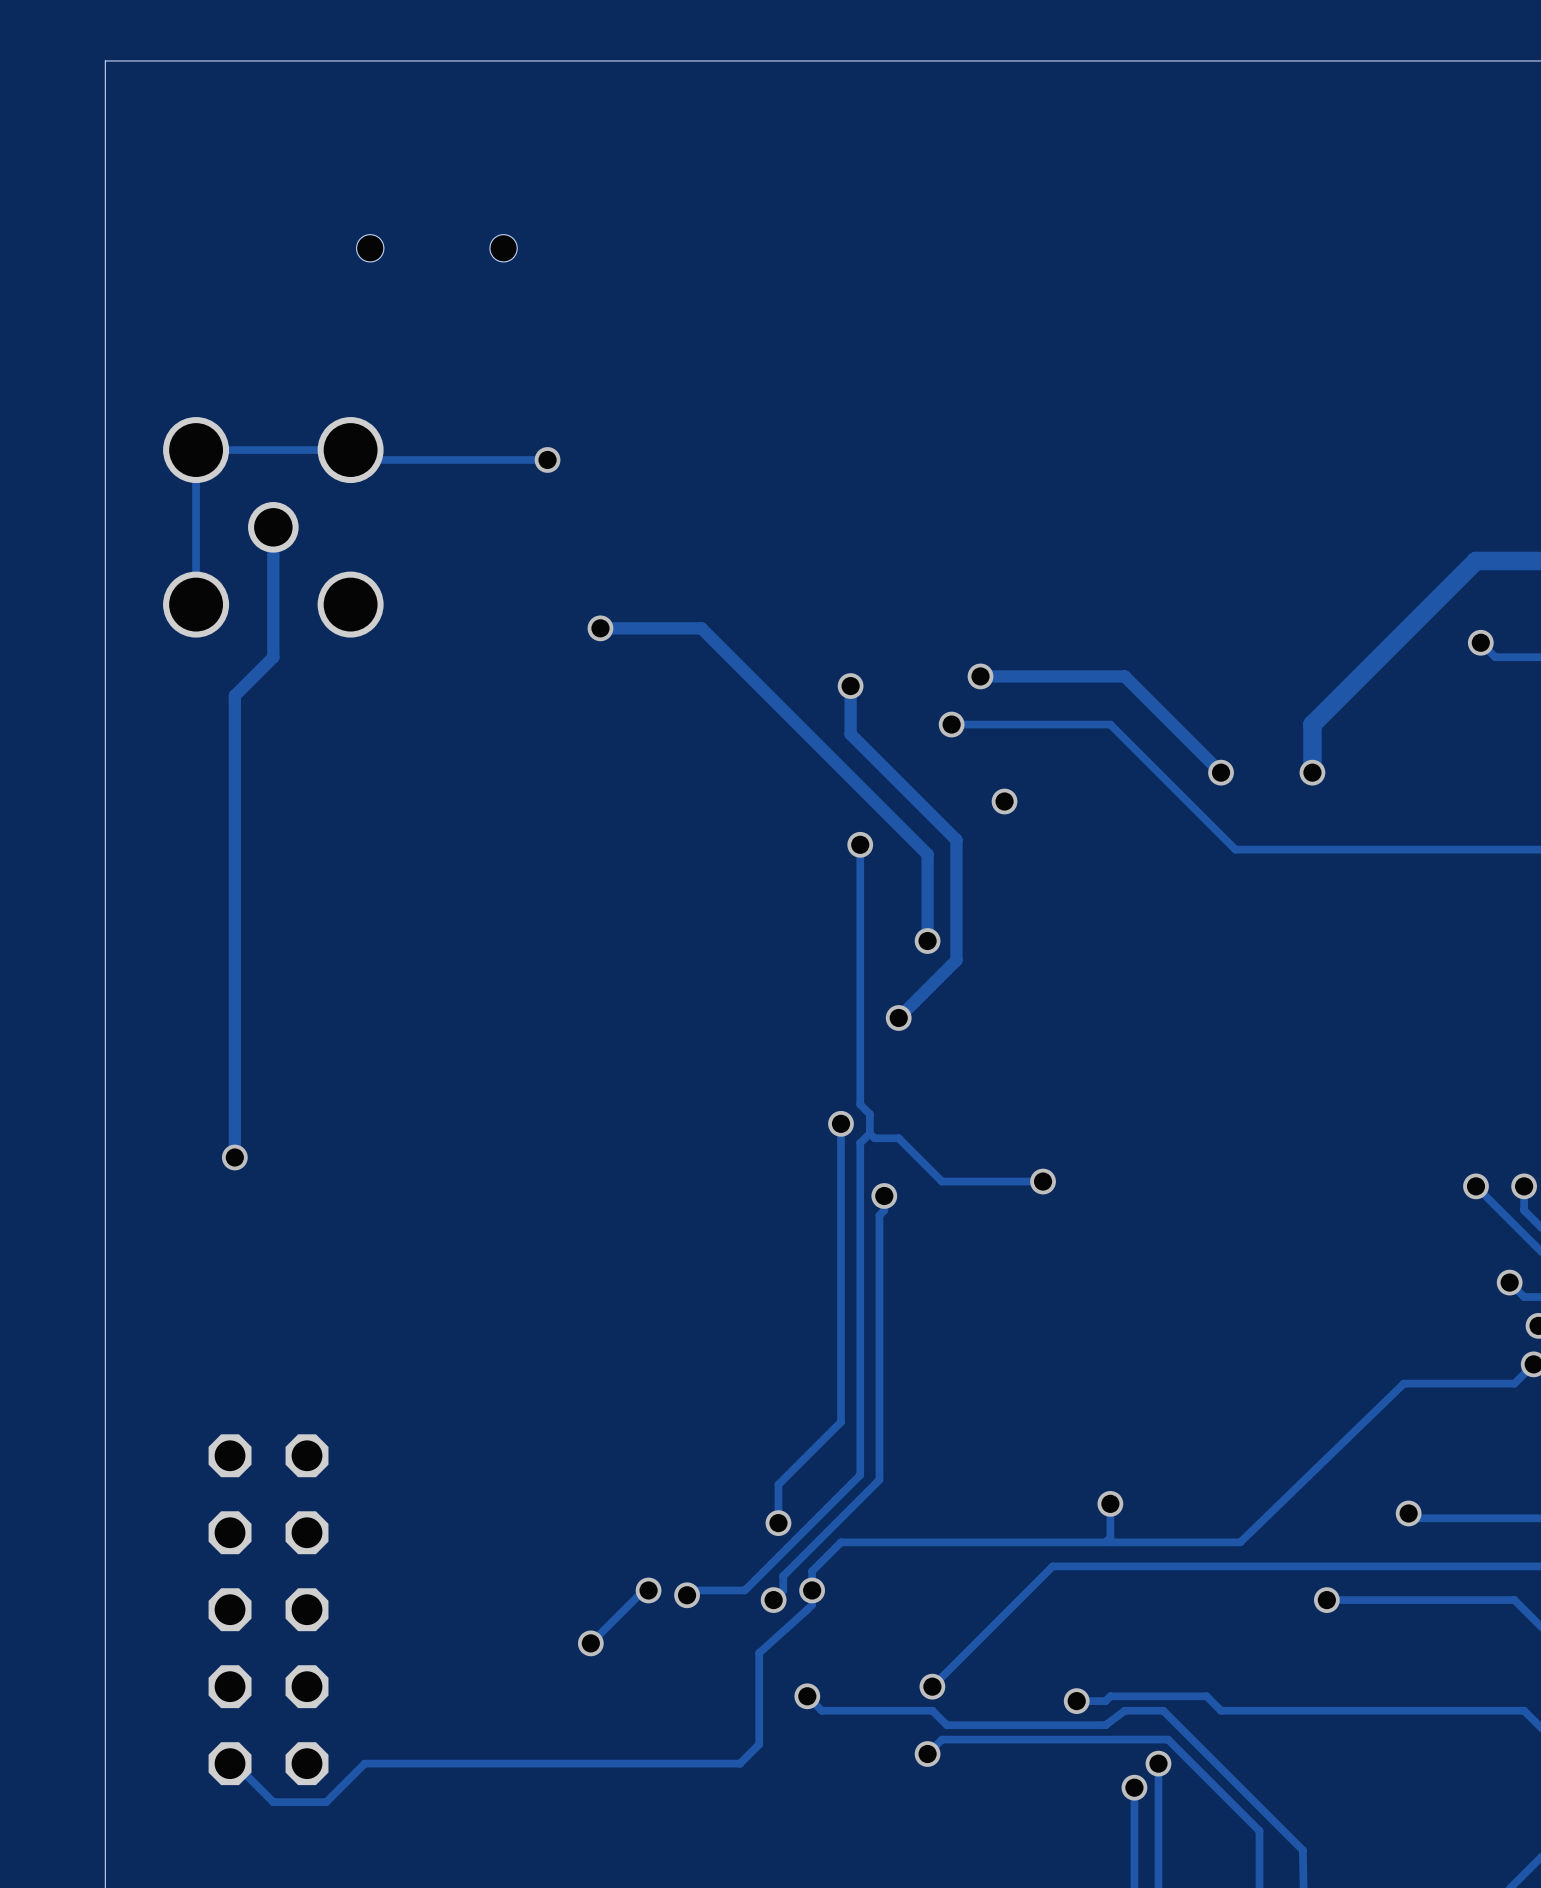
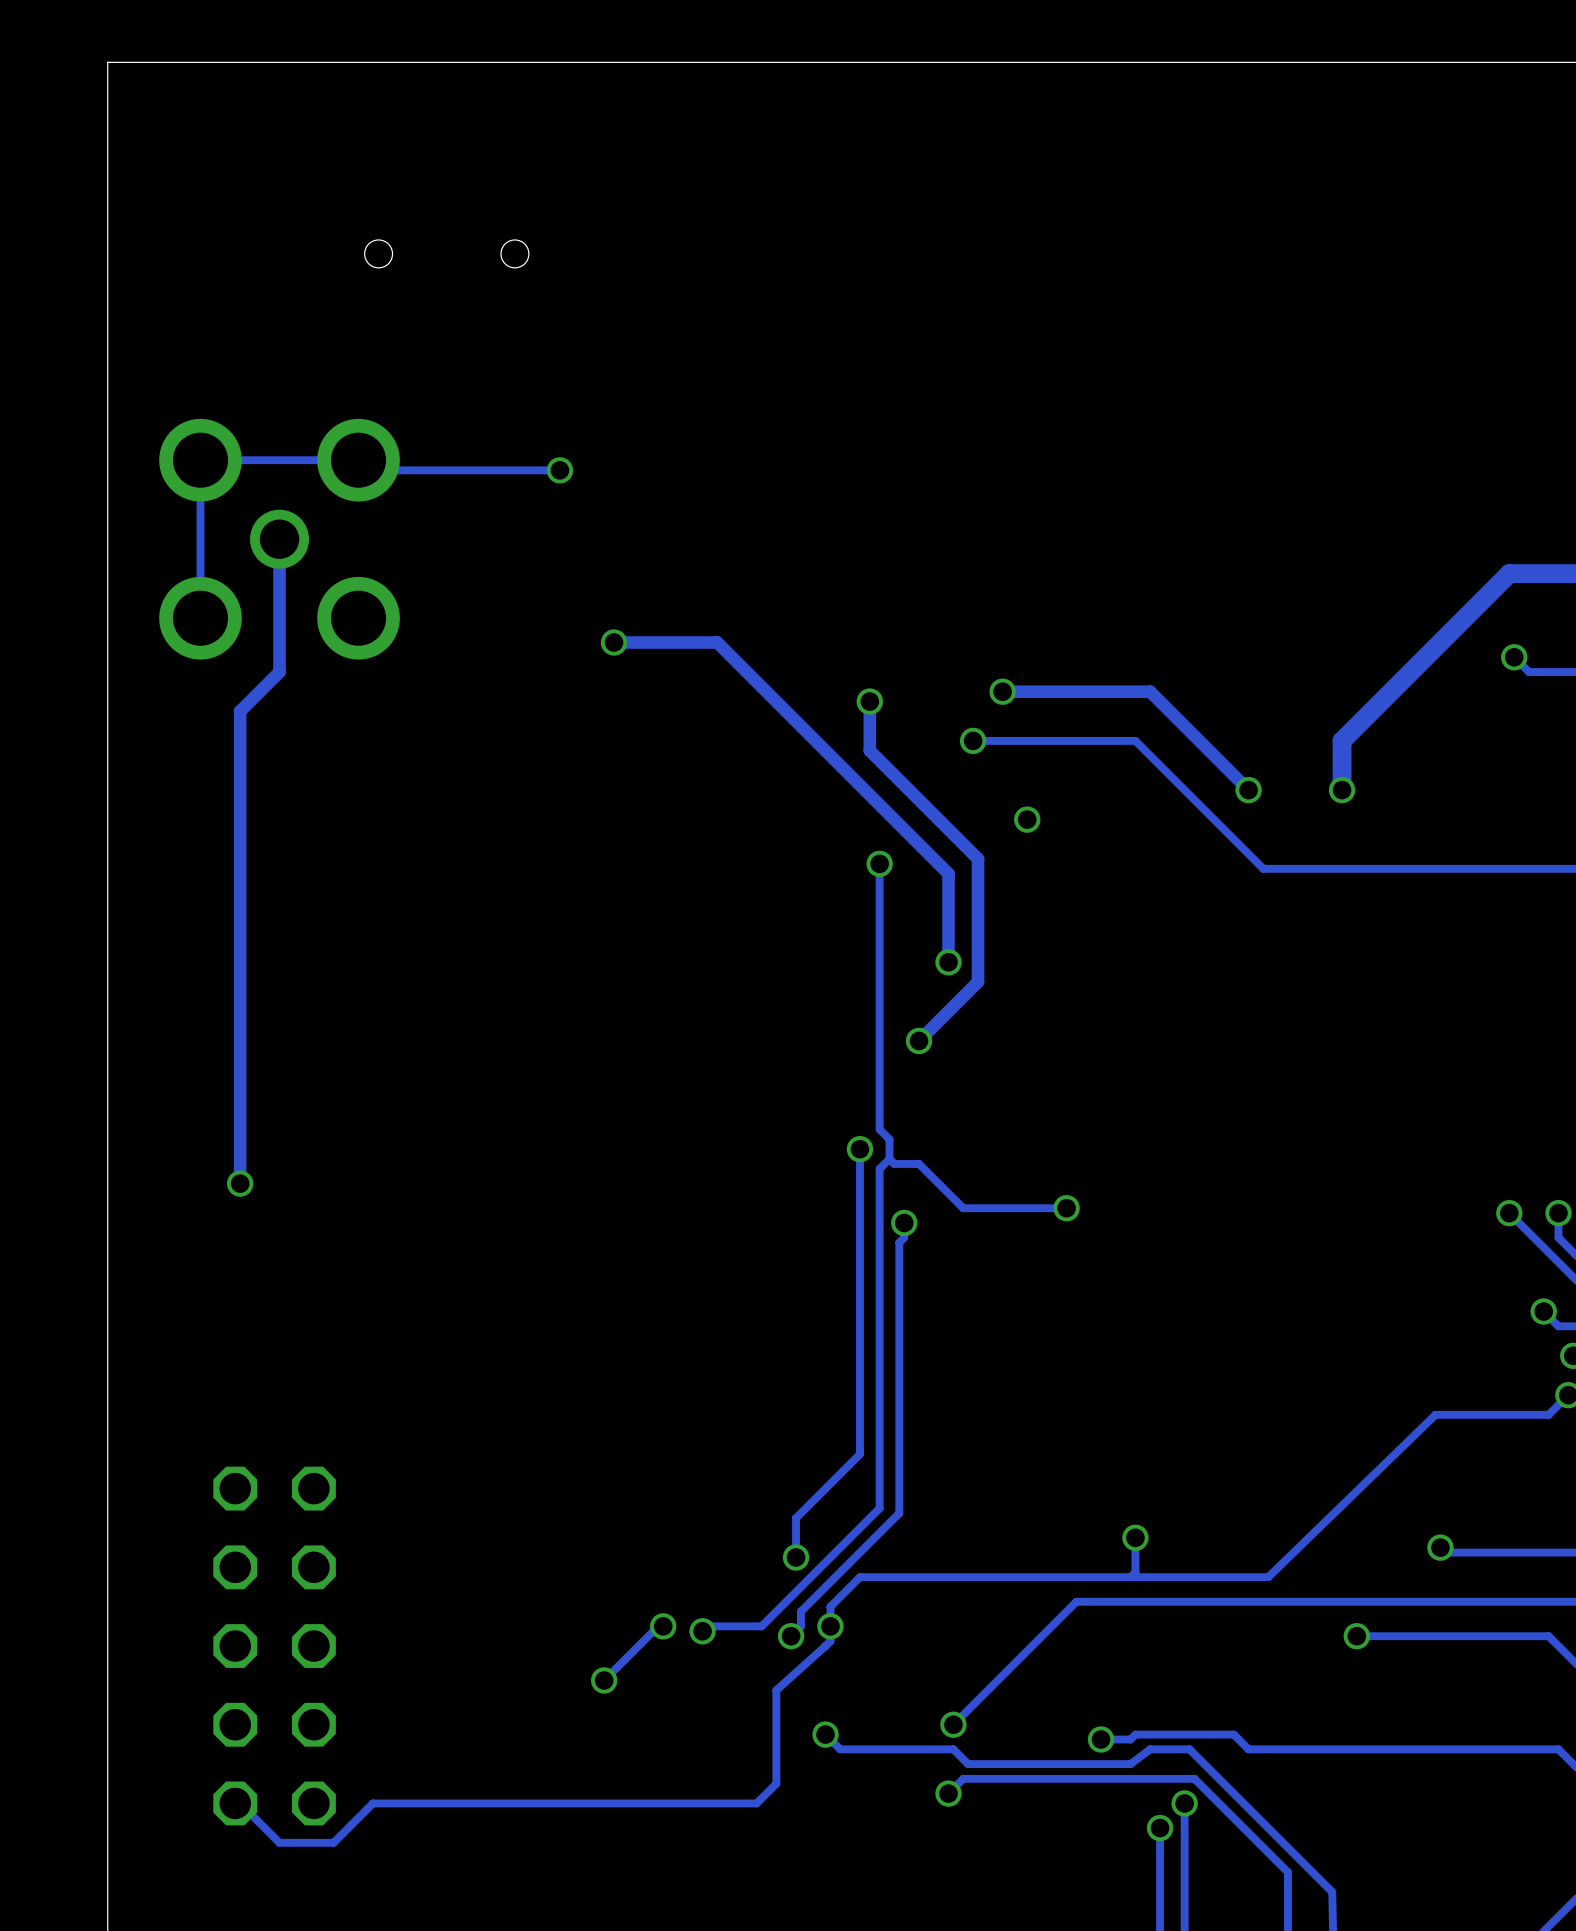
part footprint: [163, 417, 384, 638] -> [159, 418, 400, 660]

